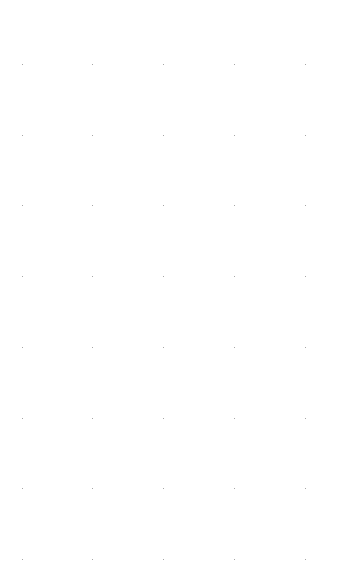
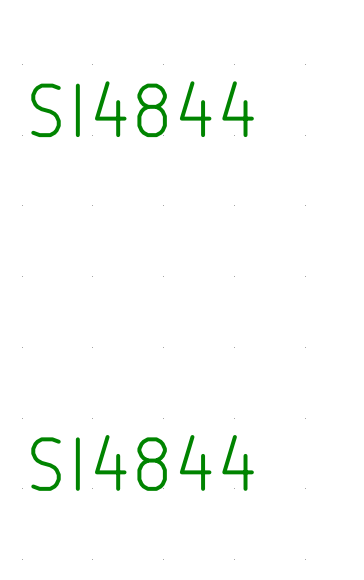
text: none -> SI4844 (142, 109)
text: none -> SI4844 (142, 462)

